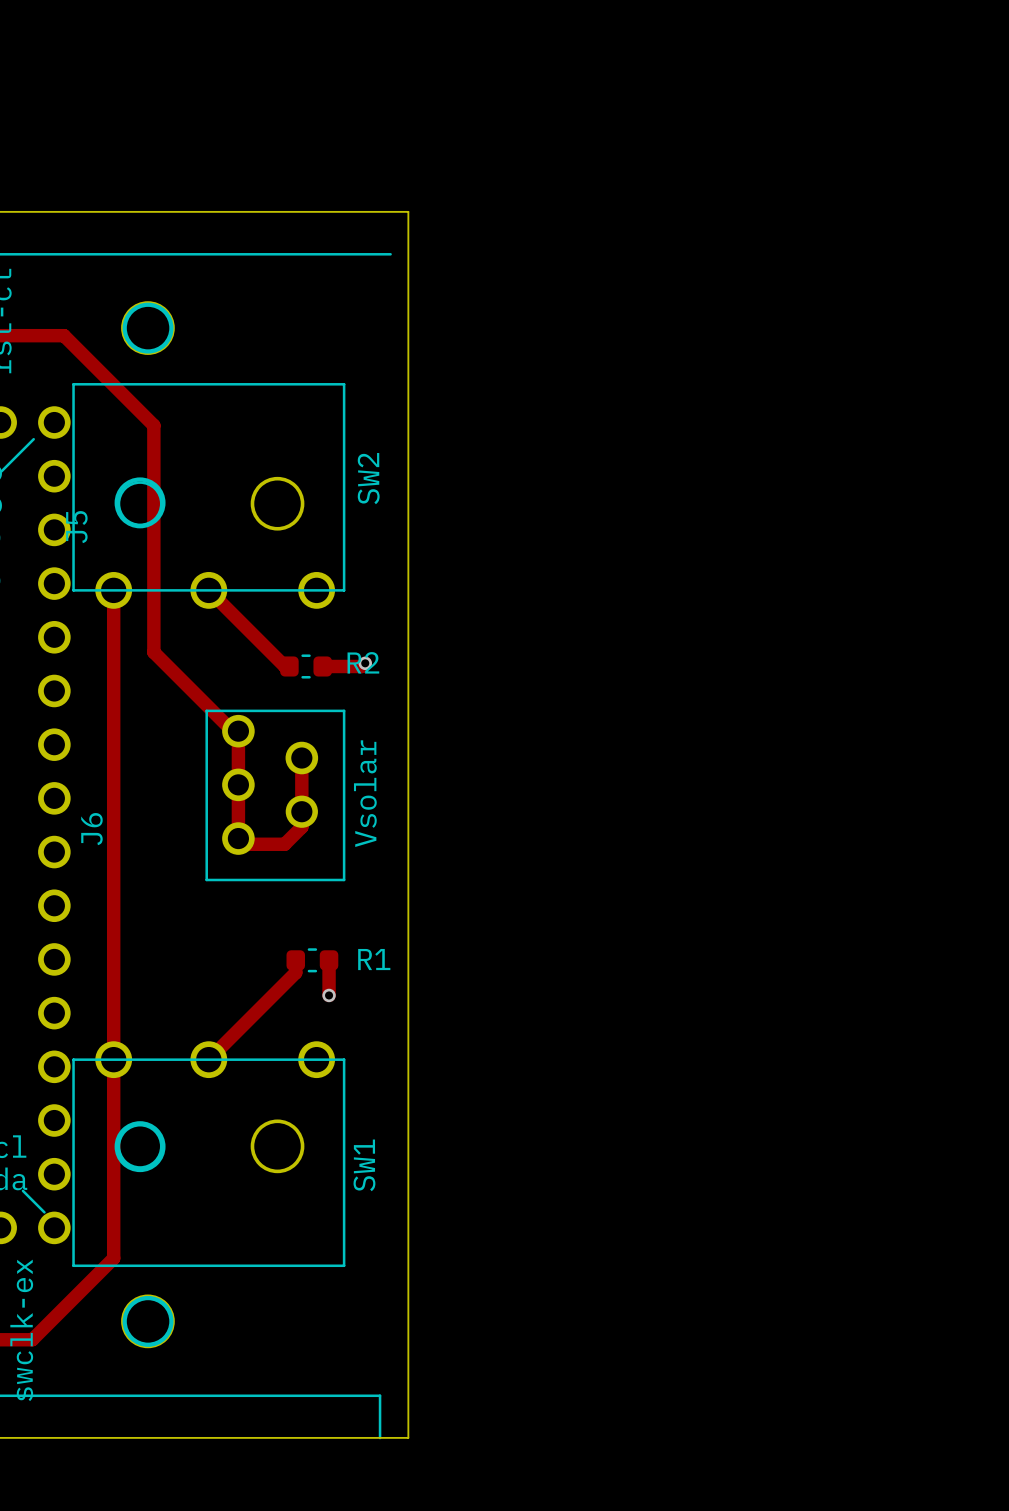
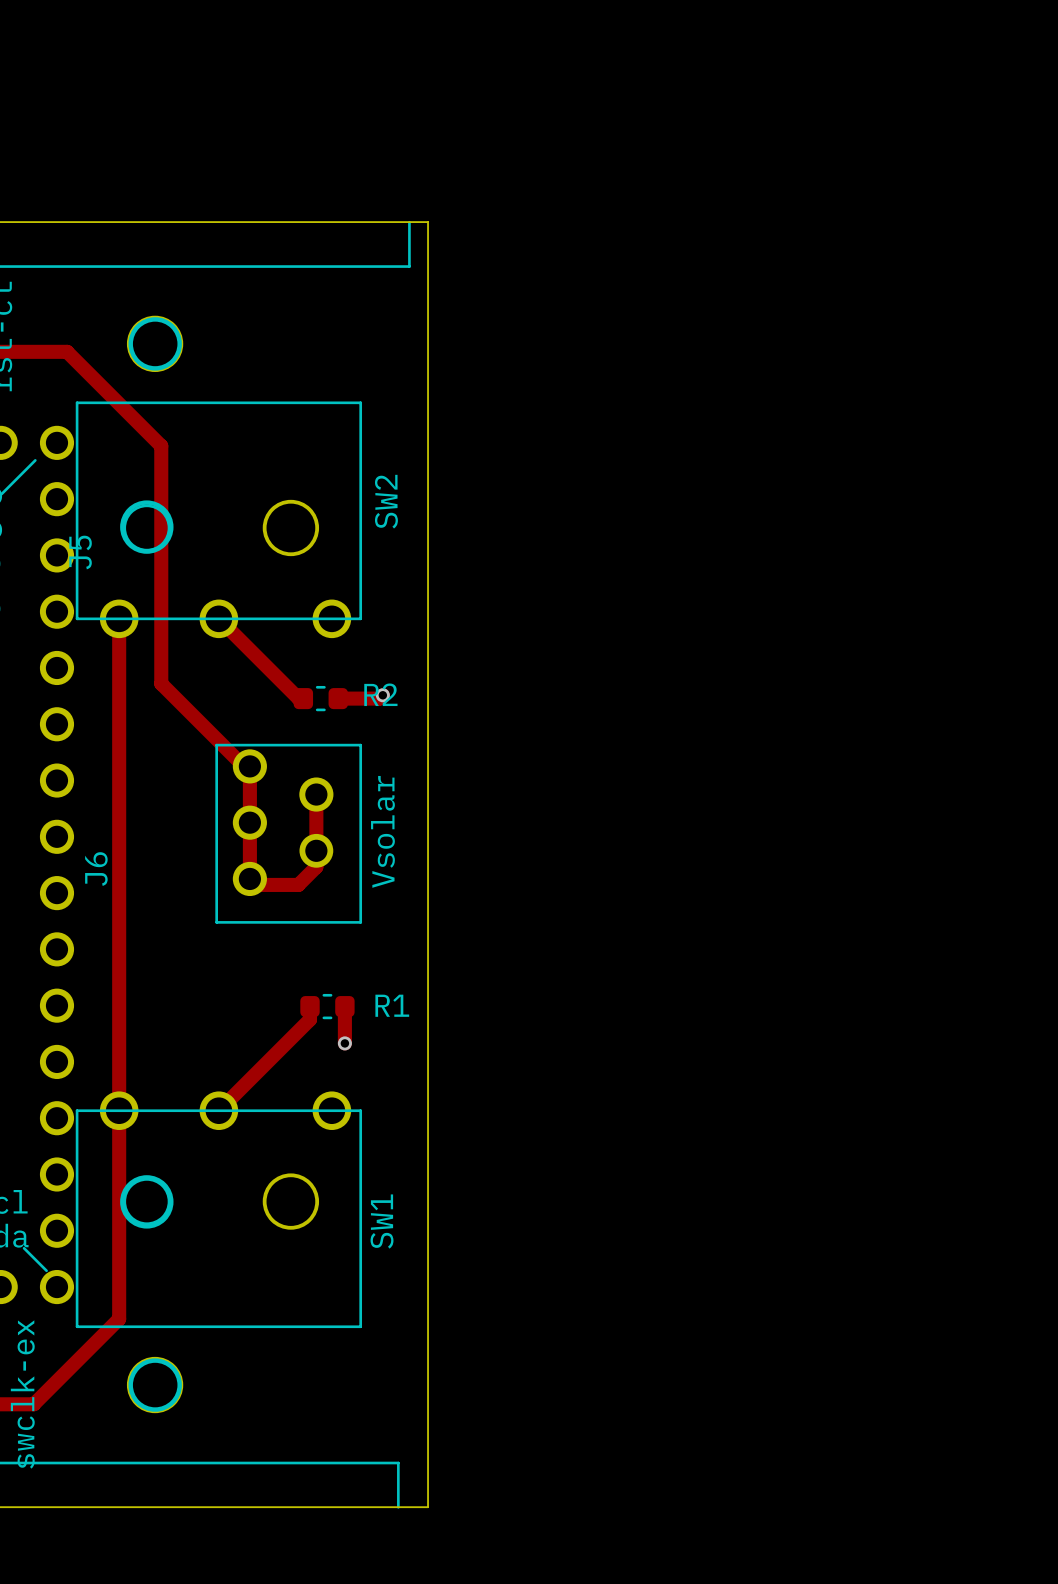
line: none -> (409, 222) (409, 266)

